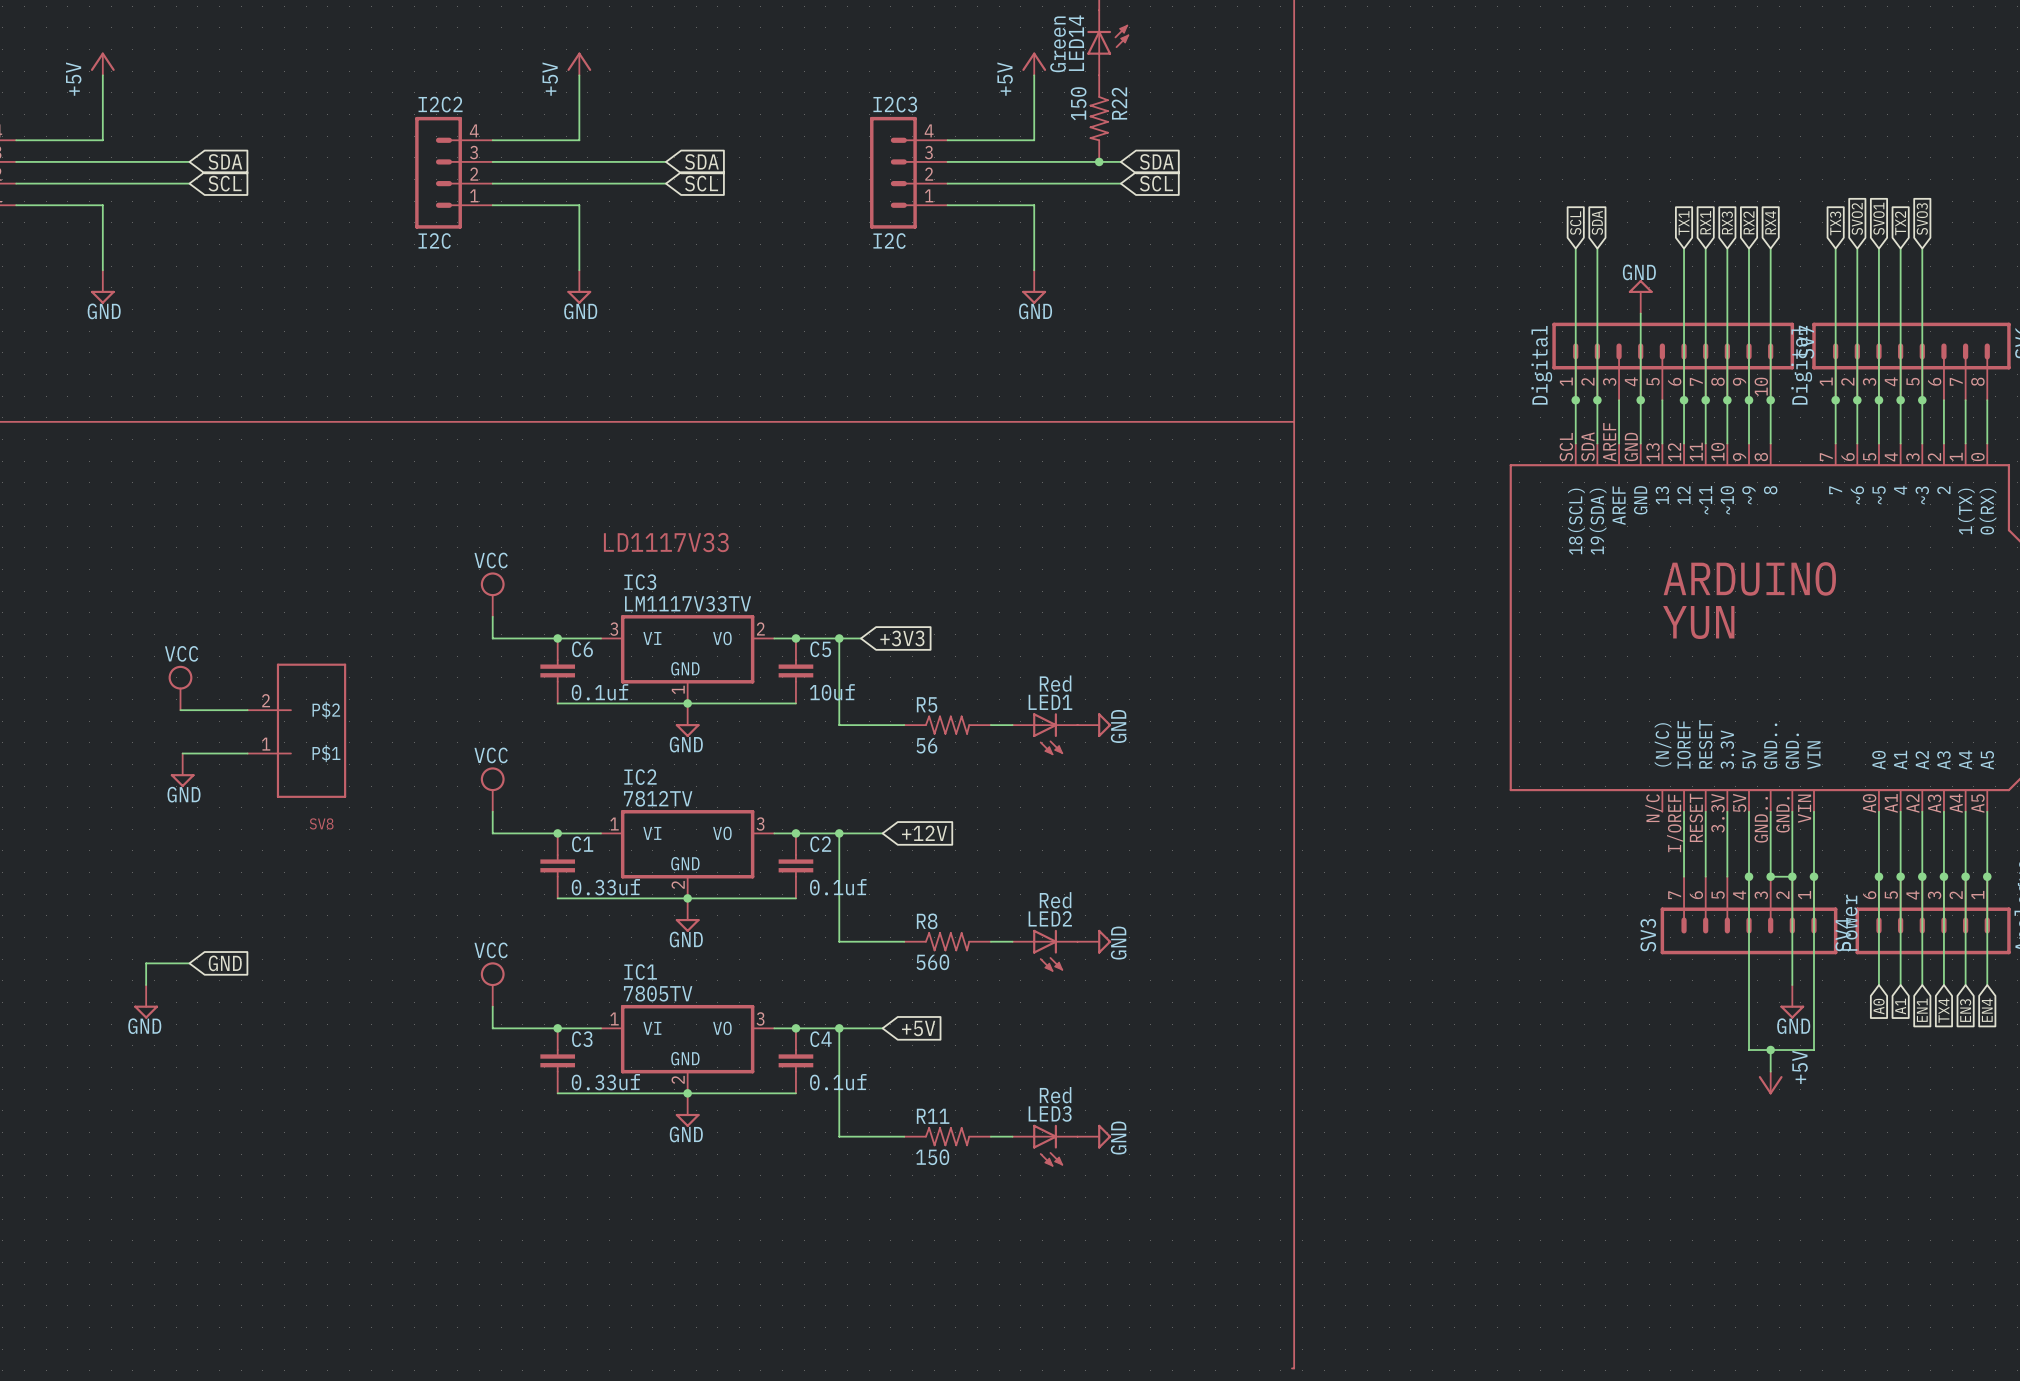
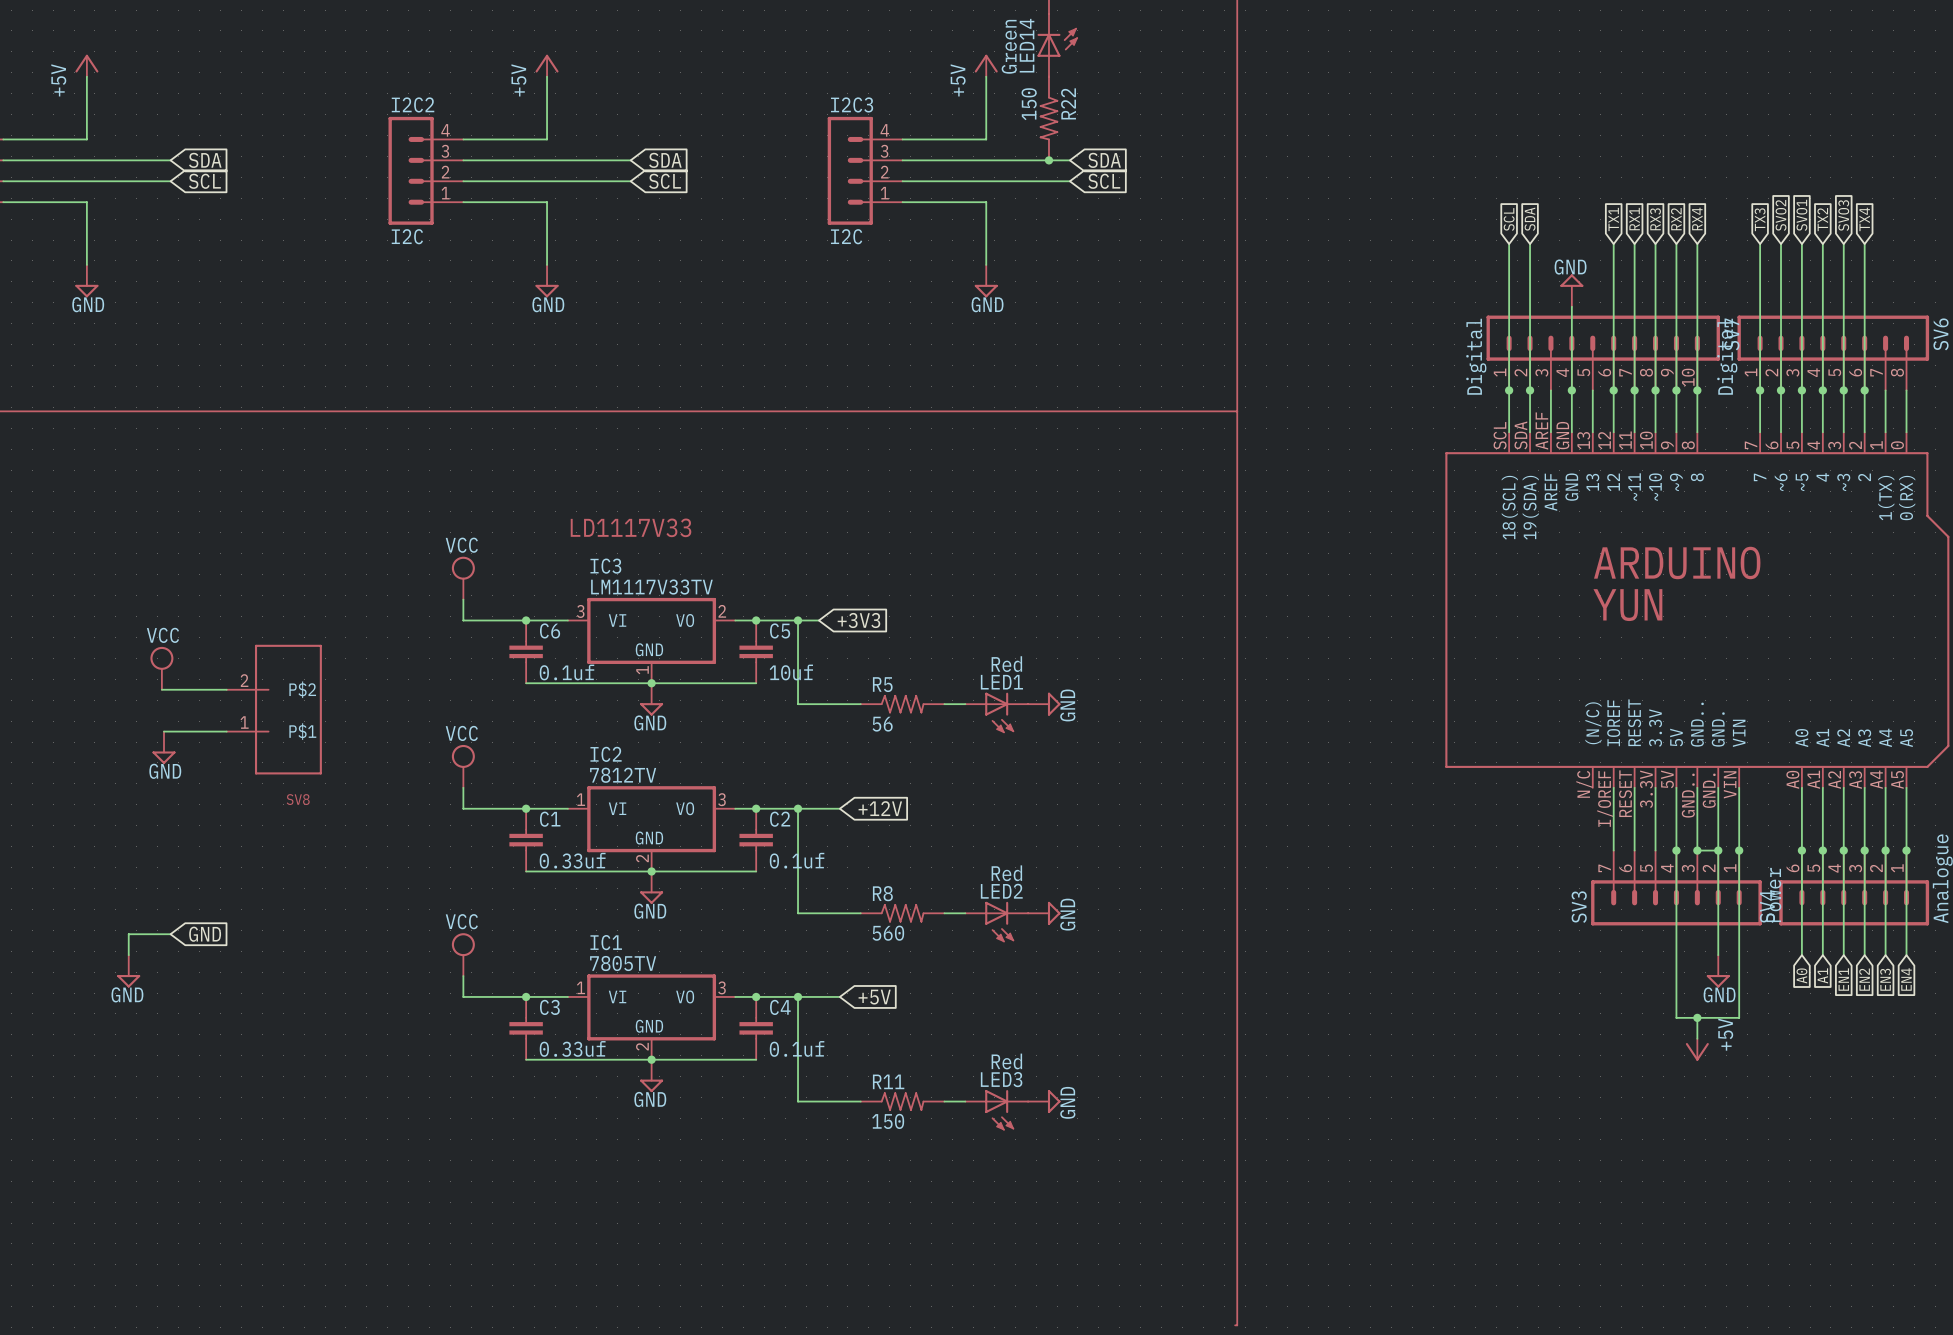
global label: none -> TX4 (1864, 219)
wire: none -> (1864, 244) (1864, 390)
junction: none -> (1864, 390)
global label: TX4 (1943, 1010) -> EN2 (1864, 979)

